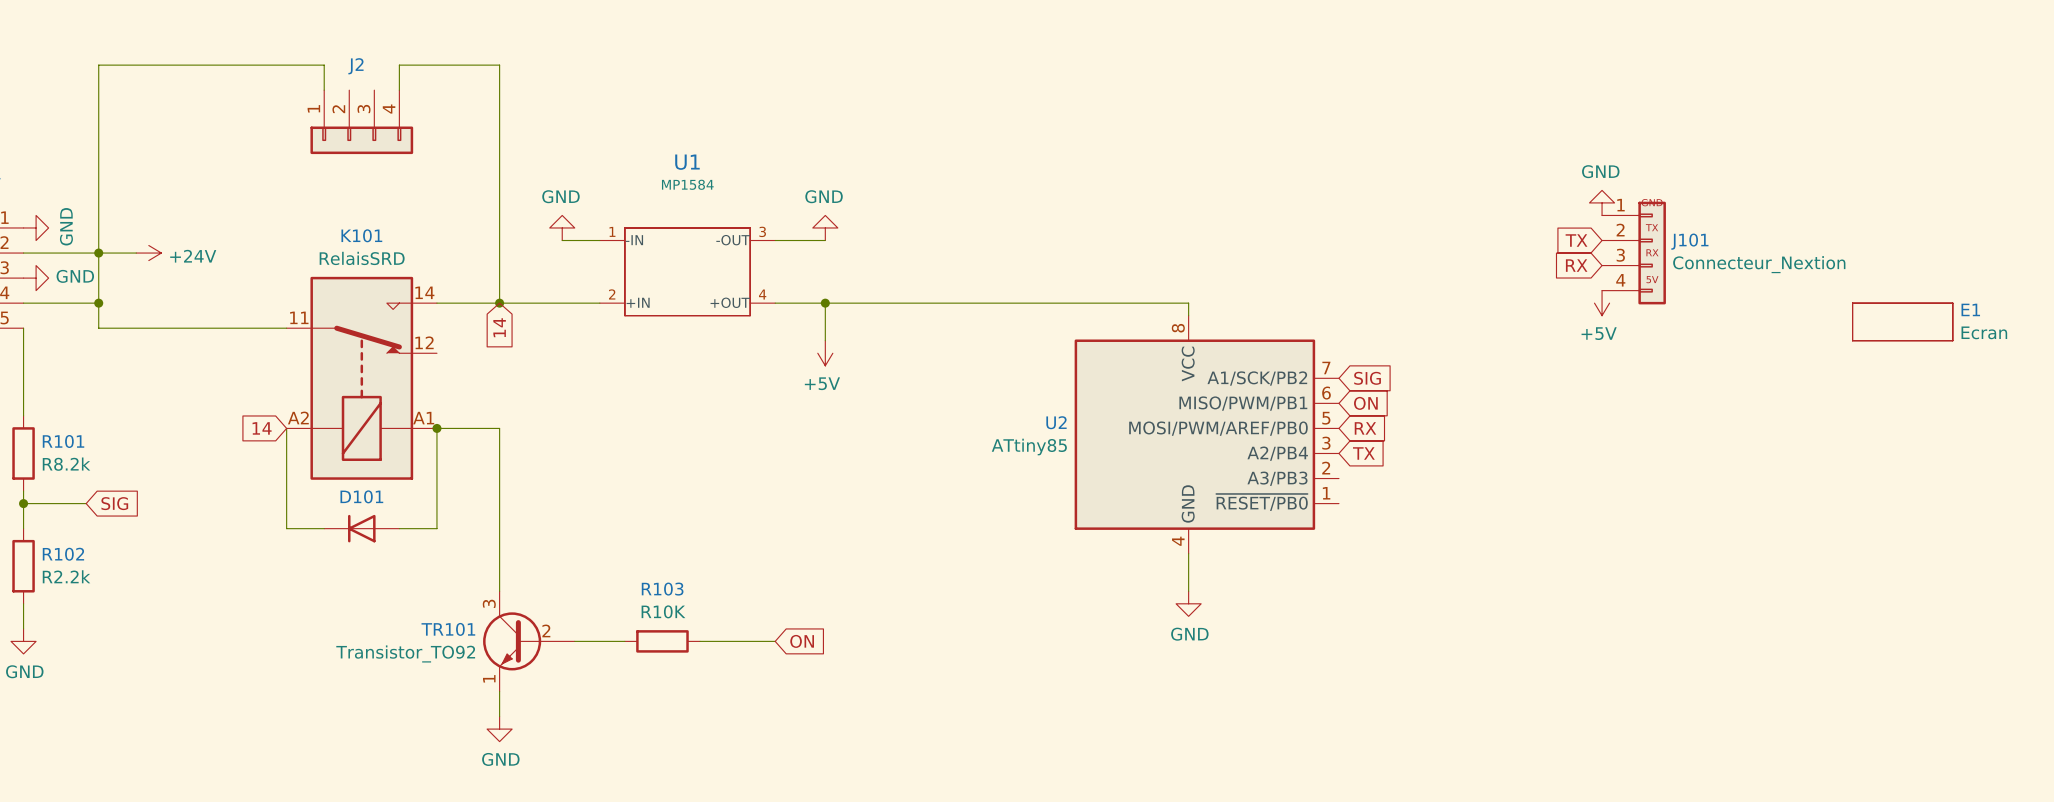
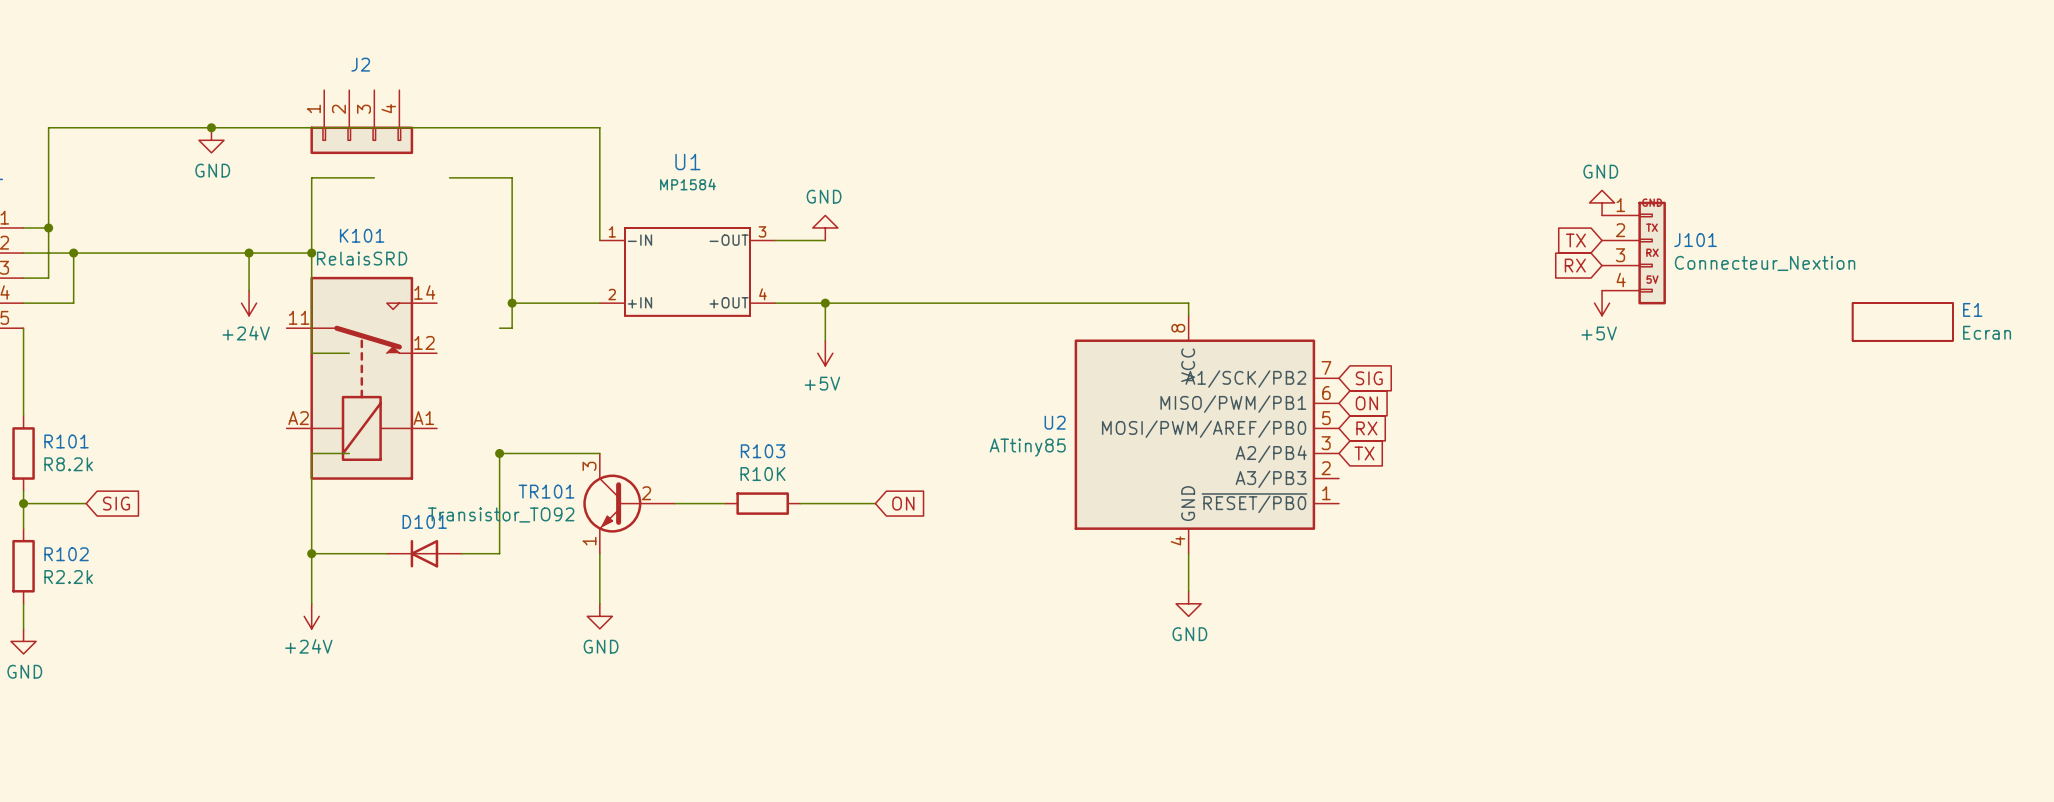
wire: (324, 90) (324, 65) (98, 65) (98, 328) (286, 328) -> none
wire: (399, 90) (399, 65) (499, 65) (499, 303) -> none
junction: none -> (211, 127)
power symbol: none -> GND (211, 140)
wire: none -> (374, 177) (311, 177) (311, 353) (349, 353)
wire: none -> (449, 177) (512, 177) (512, 328) (499, 328)
power symbol: GND (36, 227) -> none
junction: none -> (48, 227)
power symbol: GND (562, 227) -> none
wire: (562, 240) (599, 240) -> (23, 278) (48, 278) (48, 127) (599, 127) (599, 240)
junction position: (98, 253) -> (73, 253)
wire: none -> (136, 253) (311, 253)
power symbol rotation: 0° (148, 253) -> 90° clockwise (249, 303)
power symbol position: +24V (148, 253) -> +24V (249, 303)
wire: none -> (249, 253) (249, 290)
junction: none -> (249, 253)
junction: none -> (311, 253)
power symbol: GND (36, 278) -> none
wire: (73, 303) (98, 303) -> (73, 303) (73, 253)
junction: (98, 303) -> none
wire: (436, 303) (512, 303) -> none
junction position: (499, 303) -> (512, 303)
global label: 14 (499, 327) -> none
global label: 14 (262, 428) -> none
wire: (286, 428) (286, 528) (324, 528) -> none
junction: (436, 428) -> none
wire: none -> (349, 453) (311, 453) (311, 603)
wire: (499, 453) (499, 428) (436, 428) (436, 528) (399, 528) -> (499, 453) (599, 453)
junction: none -> (499, 453)
D101 position: (361, 528) -> (424, 553)
wire: none -> (311, 553) (386, 553)
junction: none -> (311, 553)
wire: (499, 553) (499, 591) -> (499, 553) (462, 553)
wire: none -> (599, 553) (599, 603)
power symbol: none -> +24V (311, 616)
TR101 position: (528, 641) -> (629, 503)
wire: (574, 641) (624, 641) -> (674, 503) (725, 503)
R103 position: (662, 641) -> (762, 503)
wire: (700, 641) (775, 641) -> (800, 503) (875, 503)
global label position: ON (802, 641) -> ON (903, 503)
wire: (499, 691) (499, 716) -> none
power symbol position: GND (499, 729) -> GND (599, 616)

